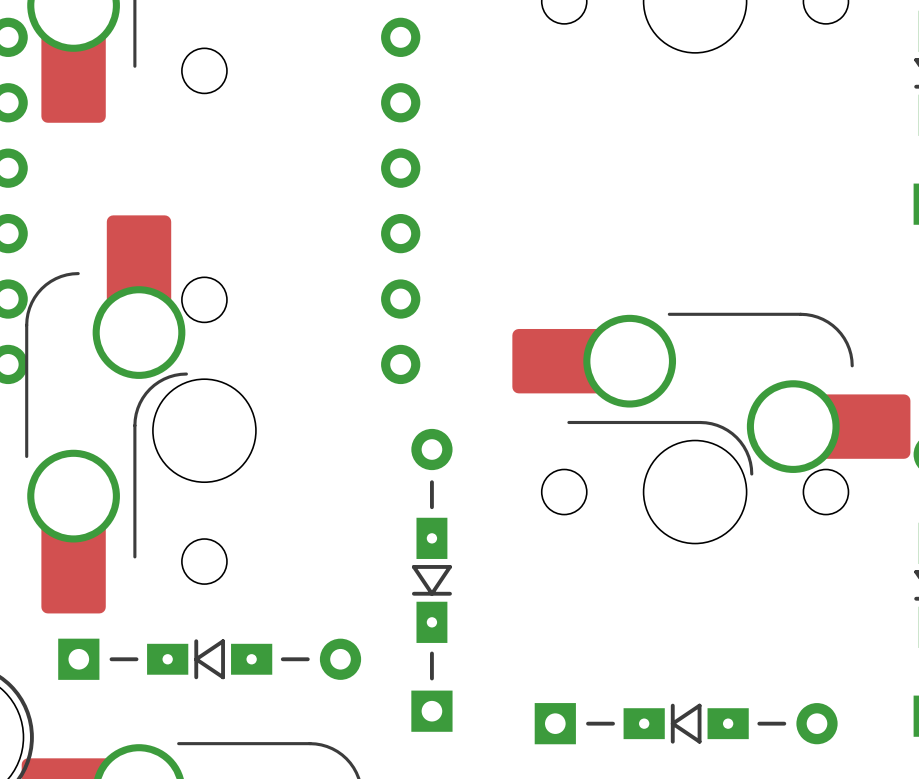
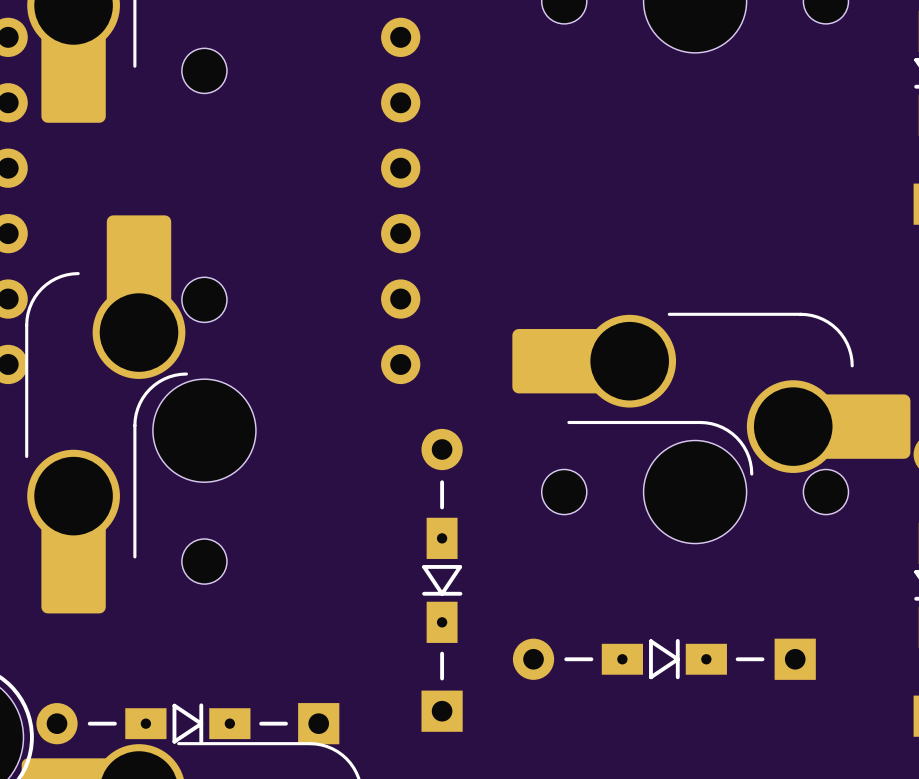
part side: top (431, 580) -> bottom (442, 580)
part side: top (209, 659) -> bottom (664, 659)
part side: top (686, 723) -> bottom (187, 723)

